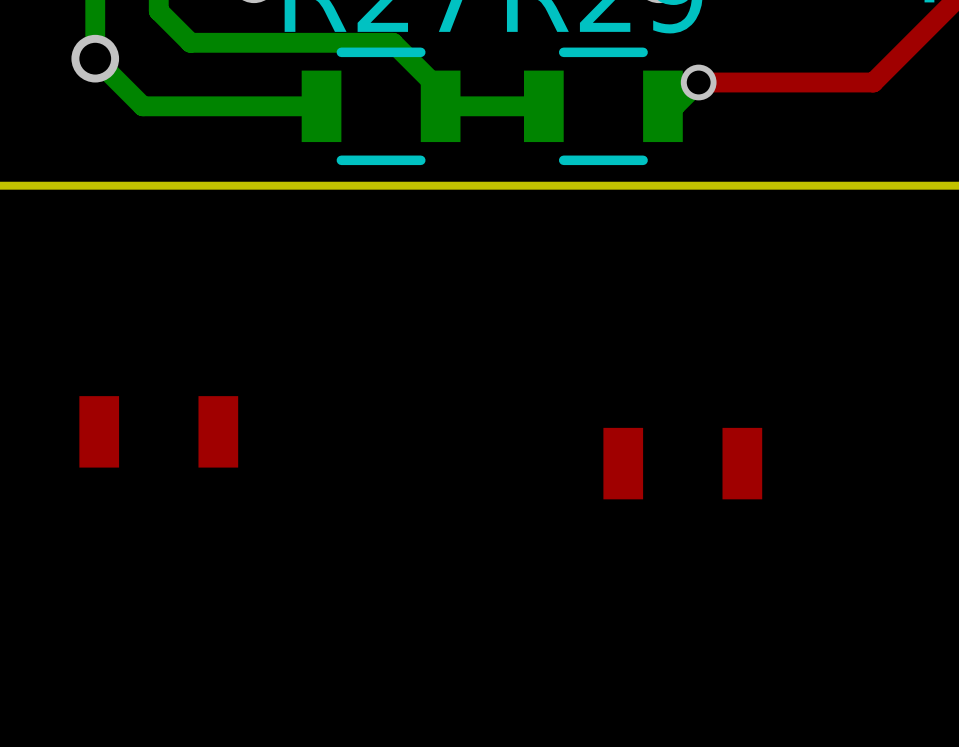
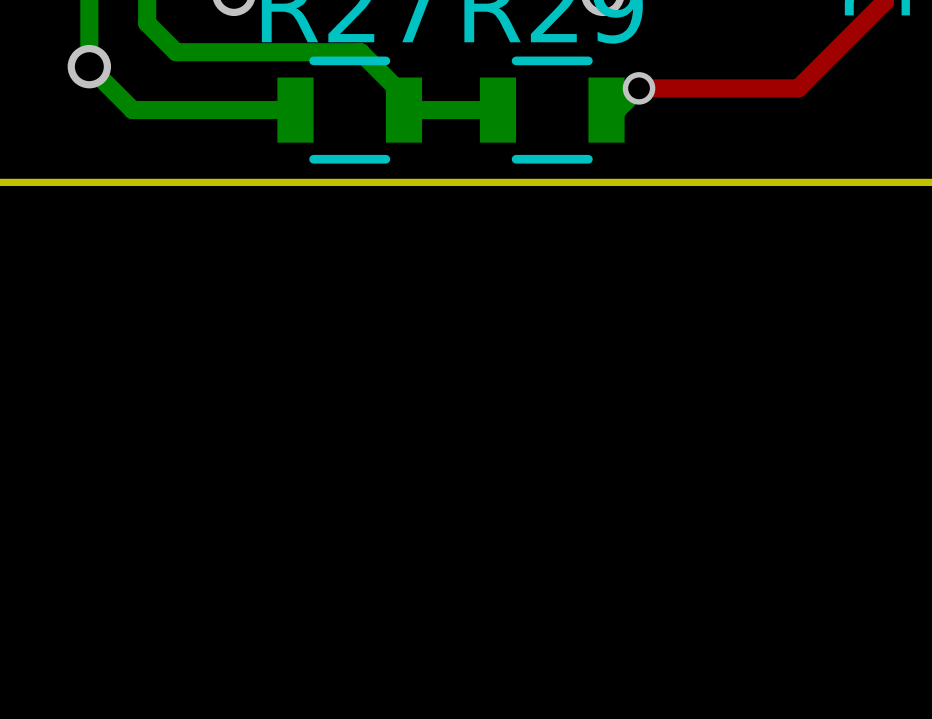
part: (158, 431) -> none
part: (682, 463) -> none

